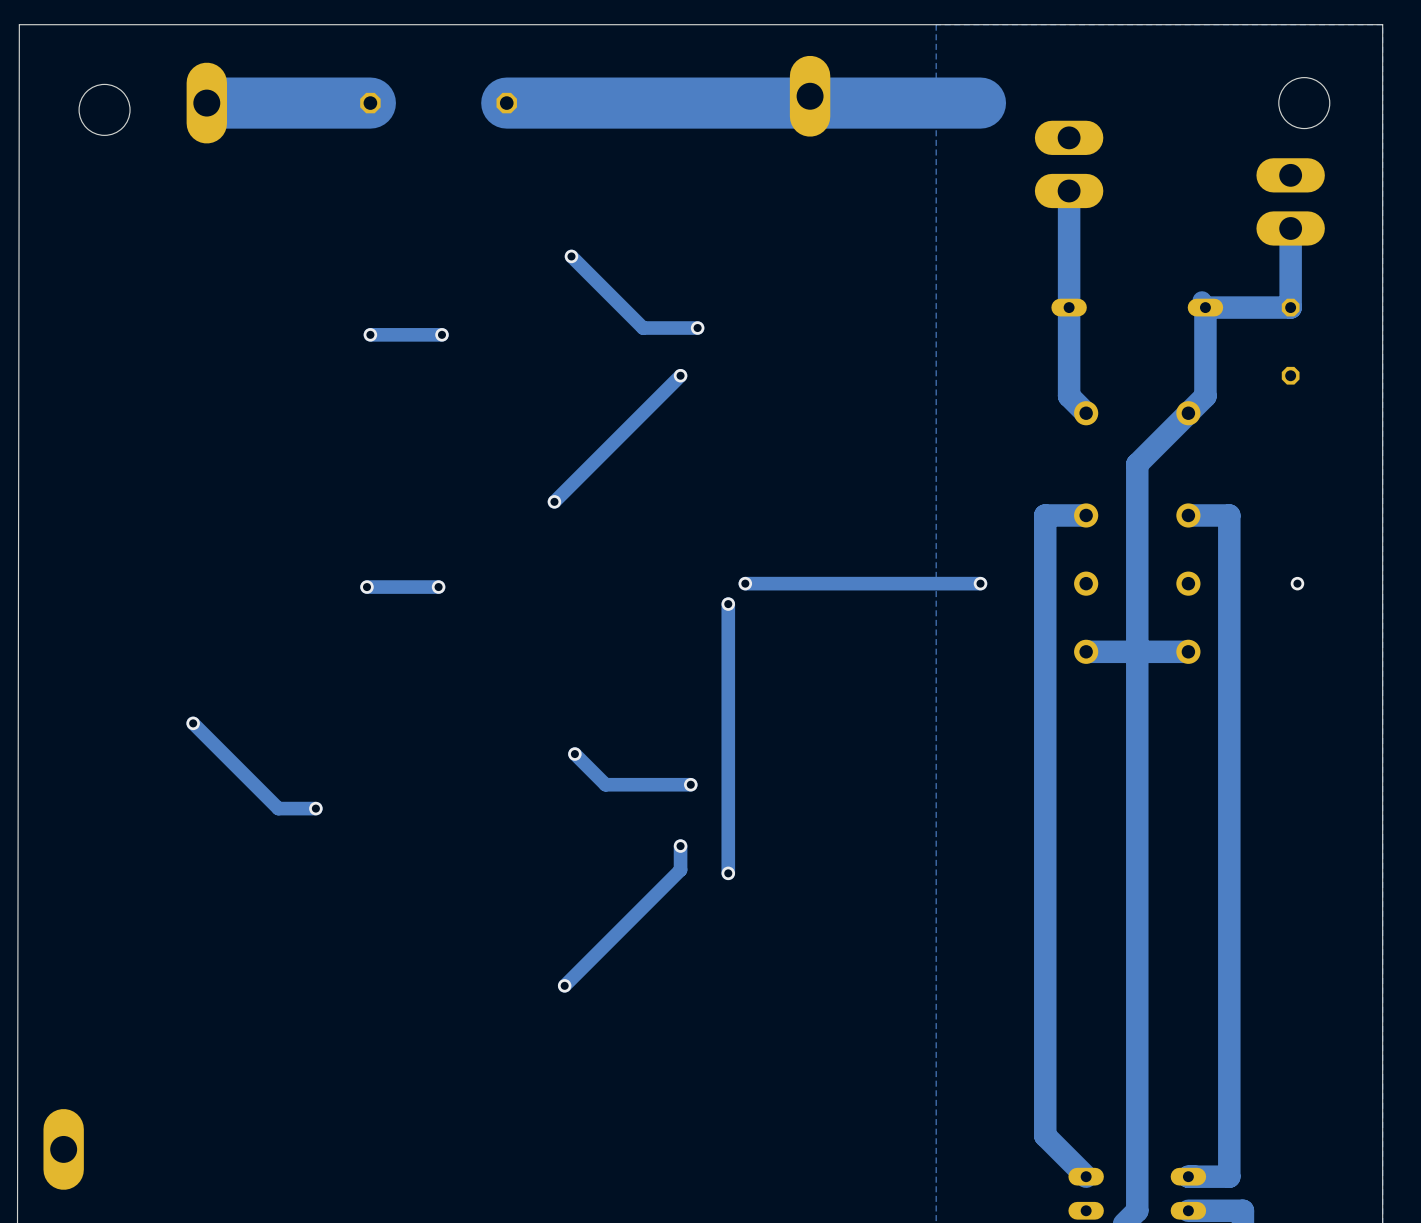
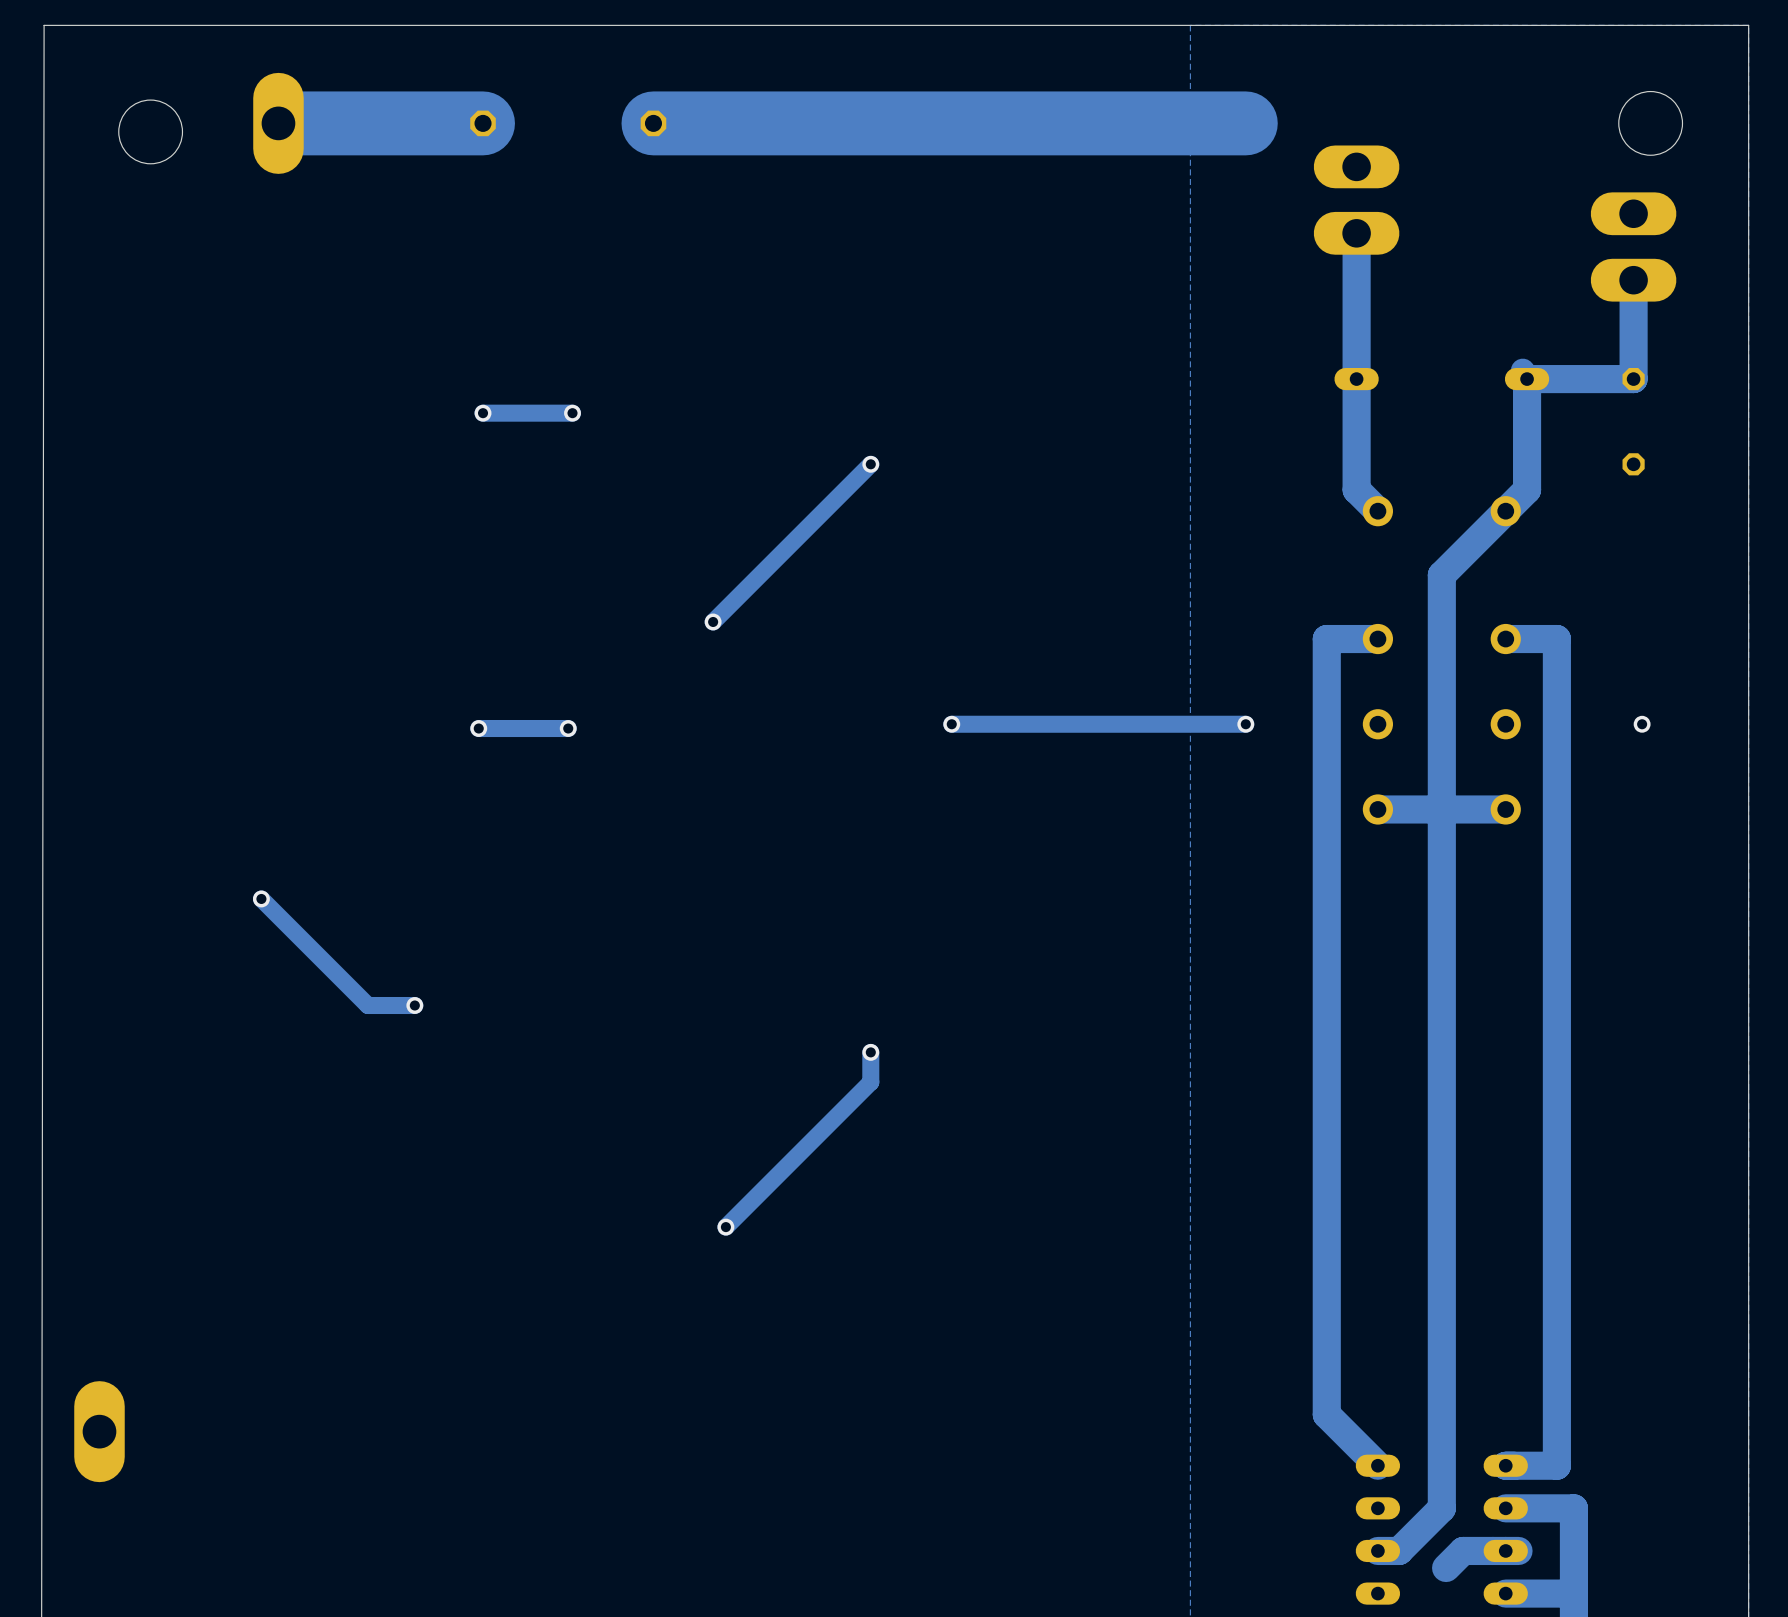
part: (810, 96) -> none
track: (571, 256) (643, 328) (697, 328) -> none
via: (571, 256) -> none
via: (697, 328) -> none
track: (728, 604) (728, 873) -> none
via: (728, 604) -> none
track: (574, 754) (605, 784) (690, 784) -> none
via: (574, 754) -> none
via: (690, 784) -> none
via: (728, 873) -> none

